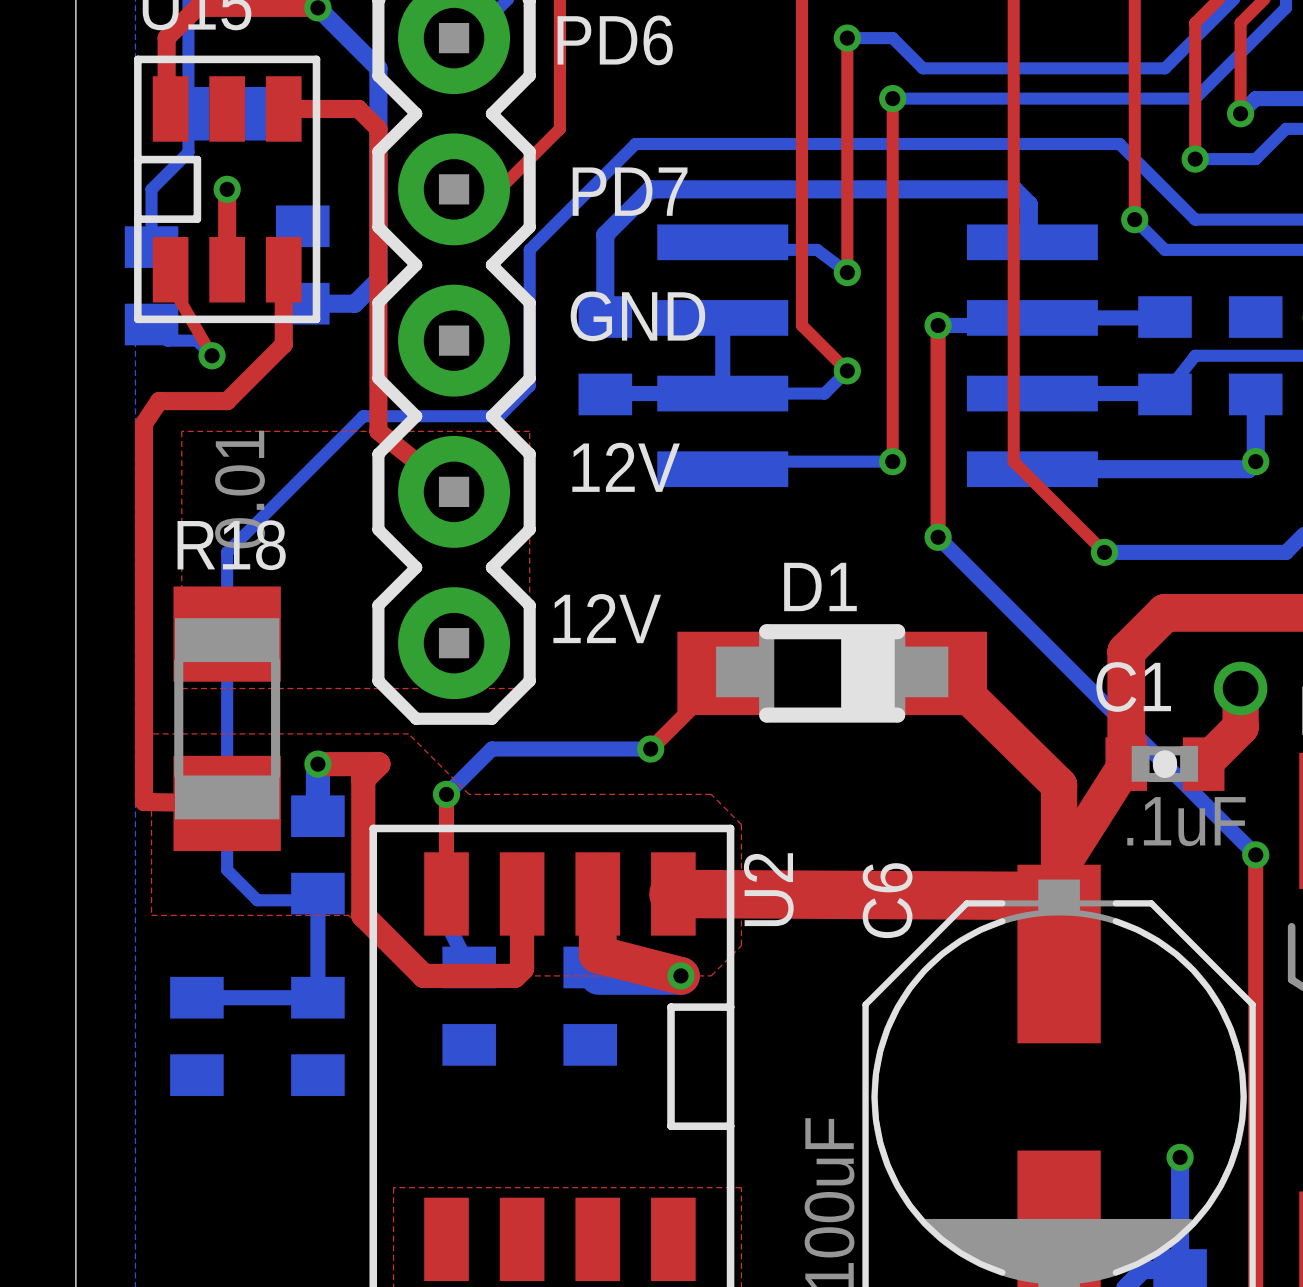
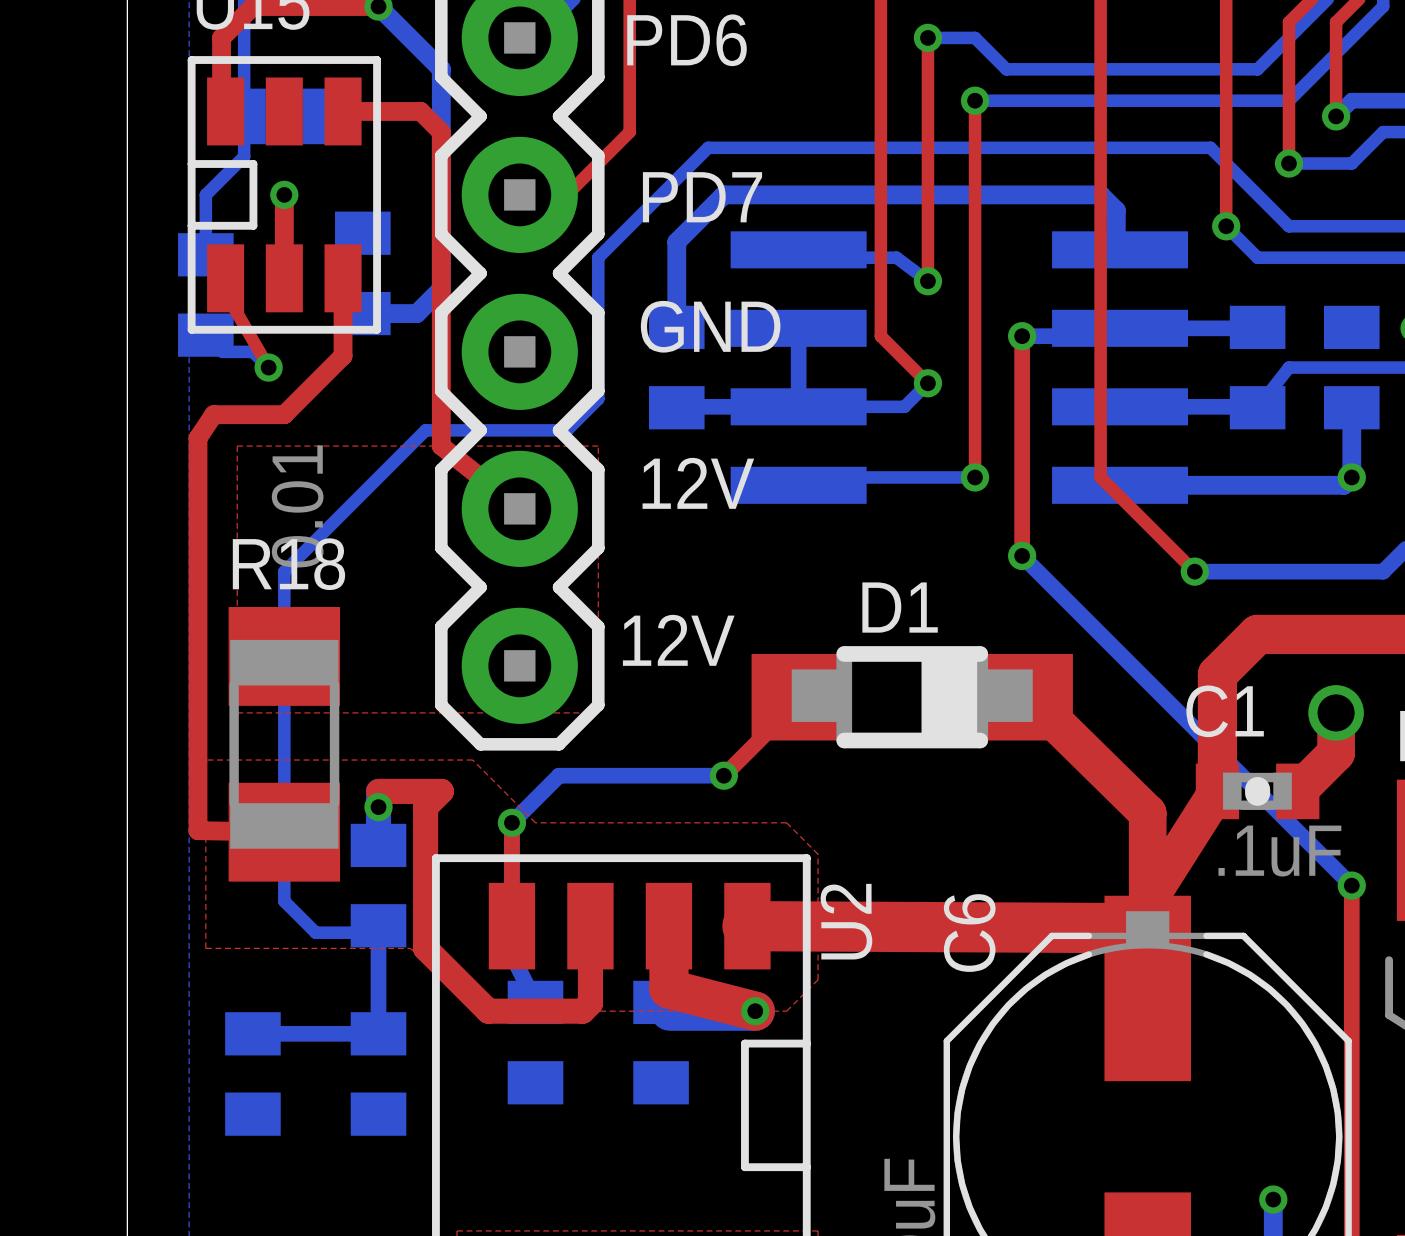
via position: (317, 764) -> (378, 807)

